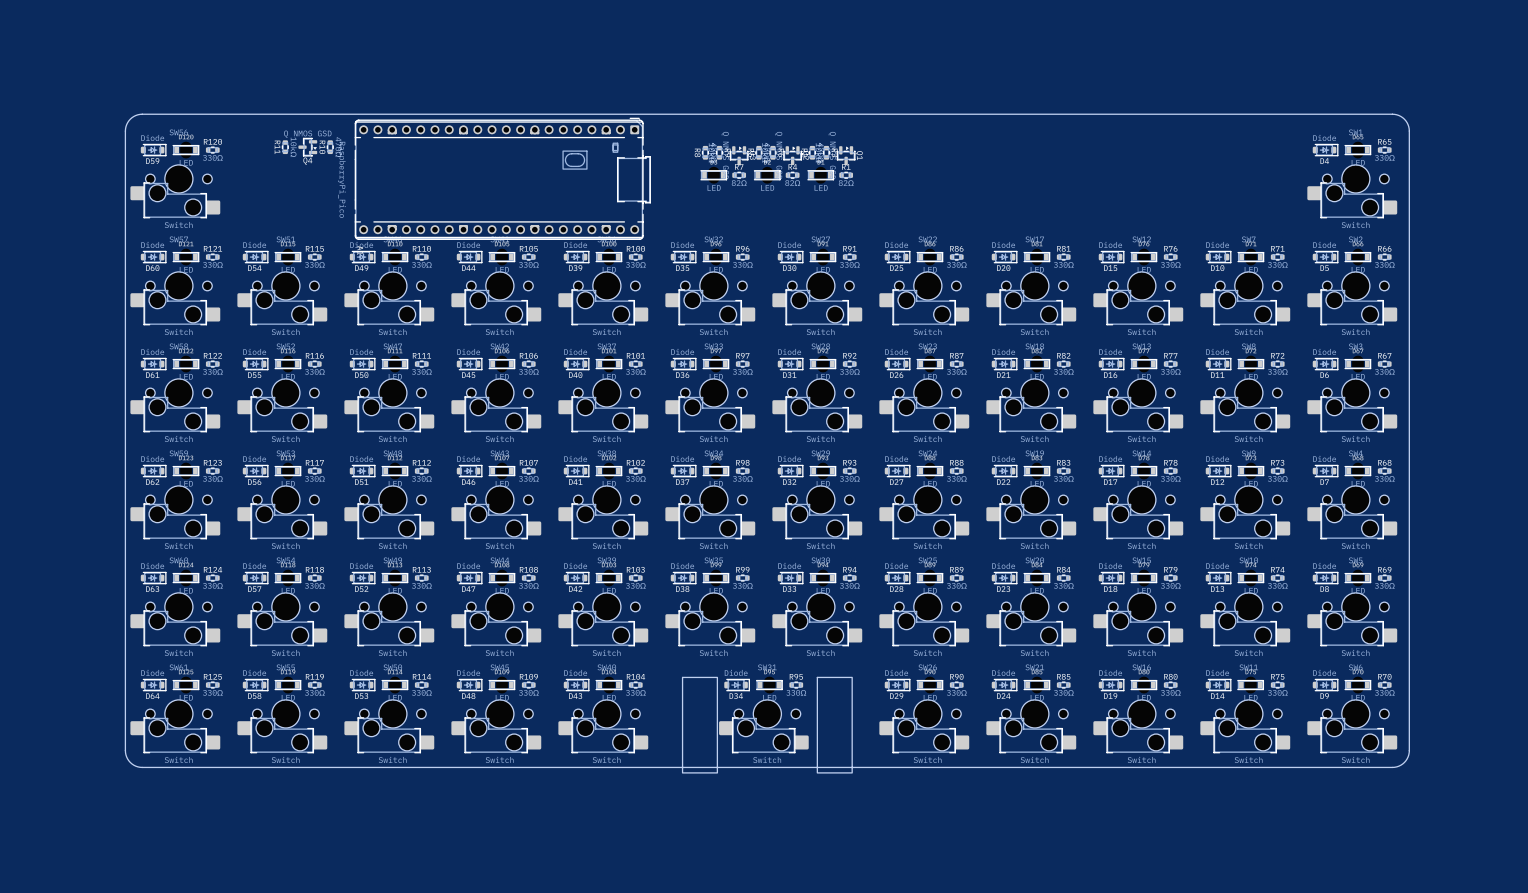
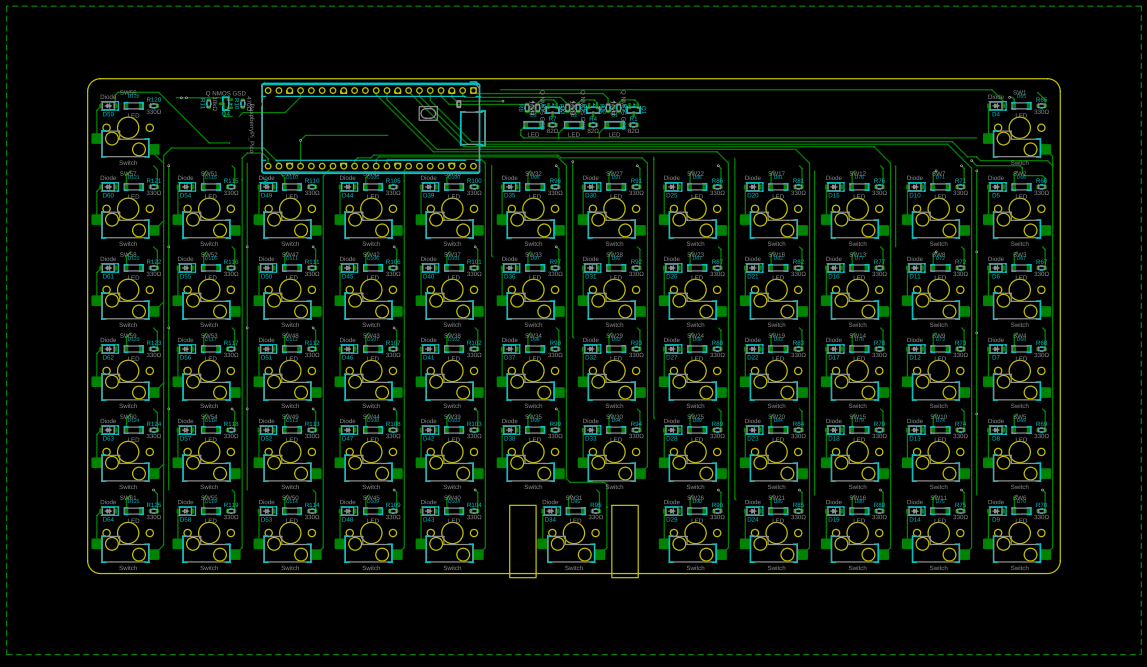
zone outline: none -> (1141, 6) (6, 6) (6, 654) (1141, 654) (1141, 6)
track: none -> (500, 89) (991, 89) (1003, 100) (1003, 105)
track: none -> (300, 90) (300, 97) (285, 112) (243, 112) (239, 116)
track: none -> (376, 90) (376, 94) (433, 151) (717, 151) (728, 163) (728, 547) (721, 554)
track: none -> (387, 90) (387, 99) (436, 149) (795, 149) (809, 163) (809, 547) (802, 554)
track: none -> (408, 90) (463, 146) (874, 146) (890, 163) (890, 547) (883, 554)
track: none -> (419, 90) (419, 96) (467, 144) (947, 144) (971, 168) (971, 547) (964, 554)
track: none -> (430, 90) (430, 100) (471, 141) (952, 141) (967, 156) (976, 156) (980, 160) (1047, 160) (1052, 165)
track: none -> (441, 90) (441, 96) (449, 104) (527, 104)
track: none -> (451, 90) (451, 96) (456, 101) (503, 101)
track: none -> (462, 90) (465, 97) (560, 97) (567, 104)
track: none -> (473, 90) (476, 93) (603, 93) (608, 98) (608, 104)
track: none -> (1037, 92) (1045, 99) (1045, 105)
track: none -> (228, 97) (176, 97)
track: none -> (1009, 97) (1014, 99) (1014, 105)
via: none -> (1009, 97)
via: none -> (181, 97)
via: none -> (186, 97)
part footprint: [172, 141, 199, 159] -> [124, 99, 144, 113]
part footprint: [1344, 141, 1371, 159] -> [1011, 99, 1032, 113]
via: none -> (503, 101)
track: none -> (224, 105) (224, 116)
track: none -> (101, 105) (96, 110) (96, 138)
track: none -> (115, 105) (115, 95) (118, 92) (158, 92) (209, 142) (229, 142)
track: none -> (556, 106) (553, 99) (541, 99) (527, 111)
track: none -> (597, 106) (594, 99) (581, 99) (567, 111)
track: none -> (637, 106) (634, 99) (622, 99) (608, 111)
track: none -> (989, 105) (988, 138)
track: none -> (232, 116) (224, 116)
track: none -> (526, 124) (520, 130) (520, 135) (523, 137) (976, 137)
track: none -> (566, 124) (558, 133) (558, 137)
track: none -> (607, 124) (599, 132) (599, 137)
track: none -> (387, 135) (305, 135) (300, 140) (300, 166)
via: none -> (300, 140)
track: none -> (154, 149) (154, 153) (163, 163)
track: none -> (1045, 149) (1052, 156) (1052, 547) (1045, 554)
track: none -> (653, 156) (655, 419)
track: none -> (734, 158) (736, 500)
track: none -> (971, 160) (976, 165) (1020, 165) (1024, 175) (1042, 175) (1045, 178) (1045, 186)
via: none -> (971, 160)
track: none -> (572, 161) (573, 337)
via: none -> (572, 161)
track: none -> (247, 163) (247, 489)
track: none -> (491, 165) (492, 256)
track: none -> (153, 165) (157, 169) (157, 186)
track: none -> (168, 165) (168, 489)
via: none -> (168, 165)
track: none -> (232, 165) (234, 168) (234, 186)
track: none -> (268, 166) (268, 158) (262, 153) (247, 153) (242, 158) (242, 547) (235, 554)
track: none -> (278, 166) (278, 163) (263, 148) (171, 148) (163, 155) (163, 545) (154, 554)
track: none -> (332, 166) (323, 175) (323, 547) (316, 554)
track: none -> (354, 166) (354, 160) (357, 157) (370, 157) (373, 155) (558, 155) (560, 157) (642, 157) (647, 163) (647, 466) (640, 473)
track: none -> (376, 166) (376, 159) (378, 156) (557, 156) (566, 165) (566, 478) (570, 482) (604, 482) (606, 484) (606, 547) (599, 554)
track: none -> (387, 166) (387, 159) (481, 159) (485, 163) (485, 547) (478, 554)
track: none -> (408, 166) (404, 170) (404, 547) (397, 554)
track: none -> (556, 165) (558, 168) (558, 186)
via: none -> (556, 165)
track: none -> (637, 165) (639, 168) (639, 186)
via: none -> (637, 165)
track: none -> (718, 165) (720, 168) (720, 186)
via: none -> (718, 165)
track: none -> (799, 165) (801, 168) (801, 186)
track: none -> (880, 165) (883, 168) (883, 186)
track: none -> (895, 165) (895, 246)
track: none -> (961, 165) (964, 168) (964, 186)
via: none -> (961, 165)
track: none -> (130, 170) (126, 175) (126, 186)
track: none -> (206, 170) (203, 173) (203, 186)
track: none -> (530, 170) (527, 173) (527, 186)
track: none -> (611, 170) (608, 173) (608, 186)
track: none -> (693, 170) (690, 173) (690, 186)
track: none -> (774, 170) (771, 173) (771, 186)
track: none -> (814, 170) (814, 495)
track: none -> (855, 170) (852, 173) (852, 186)
track: none -> (936, 170) (933, 173) (933, 186)
via: none -> (936, 170)
track: none -> (976, 170) (976, 495)
via: none -> (976, 170)
track: none -> (1017, 171) (1014, 174) (1014, 186)
track: none -> (281, 174) (284, 177) (284, 186)
track: none -> (368, 174) (365, 177) (365, 186)
track: none -> (449, 174) (446, 177) (446, 186)
part footprint: [172, 248, 199, 266] -> [124, 180, 144, 194]
part footprint: [274, 248, 301, 266] -> [201, 180, 221, 194]
part footprint: [381, 248, 408, 266] -> [282, 180, 302, 194]
part footprint: [488, 248, 515, 266] -> [363, 180, 383, 194]
part footprint: [595, 248, 622, 266] -> [444, 180, 464, 194]
part footprint: [702, 248, 729, 266] -> [525, 180, 545, 194]
part footprint: [809, 248, 836, 266] -> [606, 180, 626, 194]
part footprint: [916, 248, 943, 266] -> [687, 180, 707, 194]
part footprint: [1023, 248, 1050, 266] -> [768, 180, 789, 194]
part footprint: [1130, 248, 1157, 266] -> [849, 180, 870, 194]
part footprint: [1237, 248, 1264, 266] -> [930, 180, 951, 194]
part footprint: [1344, 248, 1371, 266] -> [1011, 180, 1032, 194]
track: none -> (101, 186) (96, 191) (96, 219)
track: none -> (178, 186) (177, 219)
track: none -> (259, 186) (258, 219)
track: none -> (340, 186) (340, 219)
track: none -> (421, 186) (421, 219)
track: none -> (502, 186) (502, 219)
track: none -> (583, 186) (583, 219)
track: none -> (664, 186) (664, 219)
track: none -> (745, 186) (745, 219)
track: none -> (826, 186) (826, 219)
track: none -> (907, 186) (907, 219)
track: none -> (989, 186) (988, 219)
track: none -> (163, 220) (154, 230)
track: none -> (153, 246) (157, 250) (157, 267)
via: none -> (168, 246)
track: none -> (232, 246) (234, 249) (234, 267)
via: none -> (247, 246)
track: none -> (313, 246) (315, 249) (315, 267)
via: none -> (313, 246)
track: none -> (394, 246) (396, 249) (396, 267)
via: none -> (394, 246)
track: none -> (475, 246) (477, 249) (477, 267)
via: none -> (475, 246)
track: none -> (556, 246) (558, 249) (558, 267)
via: none -> (556, 246)
track: none -> (637, 246) (639, 249) (639, 267)
track: none -> (718, 246) (720, 249) (720, 267)
track: none -> (799, 246) (801, 249) (801, 267)
track: none -> (880, 246) (883, 249) (883, 267)
track: none -> (961, 246) (964, 249) (964, 267)
track: none -> (1042, 246) (1045, 249) (1045, 267)
track: none -> (130, 251) (126, 256) (126, 267)
track: none -> (206, 251) (203, 254) (203, 267)
track: none -> (287, 251) (284, 254) (284, 267)
track: none -> (368, 251) (365, 254) (365, 267)
track: none -> (449, 251) (446, 254) (446, 267)
track: none -> (530, 251) (527, 254) (527, 267)
track: none -> (611, 251) (608, 254) (608, 267)
track: none -> (693, 251) (690, 254) (690, 267)
track: none -> (774, 251) (771, 254) (771, 267)
track: none -> (855, 251) (852, 254) (852, 267)
track: none -> (936, 251) (933, 254) (933, 267)
via: none -> (936, 251)
via: none -> (976, 251)
track: none -> (1017, 251) (1014, 254) (1014, 267)
part footprint: [172, 355, 199, 373] -> [124, 261, 144, 275]
part footprint: [274, 355, 301, 373] -> [201, 261, 221, 275]
part footprint: [381, 355, 408, 373] -> [282, 261, 302, 275]
part footprint: [488, 355, 515, 373] -> [363, 261, 383, 275]
part footprint: [595, 355, 622, 373] -> [444, 261, 464, 275]
part footprint: [702, 355, 729, 373] -> [525, 261, 545, 275]
part footprint: [809, 355, 836, 373] -> [606, 261, 626, 275]
part footprint: [916, 355, 943, 373] -> [687, 261, 707, 275]
part footprint: [1023, 355, 1050, 373] -> [768, 261, 789, 275]
part footprint: [1130, 355, 1157, 373] -> [849, 261, 870, 275]
part footprint: [1237, 355, 1264, 373] -> [930, 261, 951, 275]
part footprint: [1344, 355, 1371, 373] -> [1011, 261, 1032, 275]
track: none -> (101, 267) (96, 272) (96, 300)
track: none -> (178, 267) (177, 300)
track: none -> (259, 267) (258, 300)
track: none -> (340, 267) (340, 300)
track: none -> (421, 267) (421, 300)
track: none -> (502, 267) (502, 300)
track: none -> (583, 267) (583, 300)
track: none -> (664, 267) (664, 300)
track: none -> (745, 267) (745, 300)
track: none -> (826, 267) (826, 300)
track: none -> (907, 267) (907, 300)
track: none -> (989, 267) (988, 300)
track: none -> (163, 301) (154, 311)
track: none -> (153, 327) (157, 331) (157, 349)
via: none -> (168, 327)
track: none -> (232, 327) (234, 330) (234, 349)
via: none -> (247, 327)
track: none -> (313, 327) (315, 330) (315, 349)
via: none -> (313, 327)
track: none -> (394, 327) (396, 330) (396, 349)
via: none -> (394, 327)
track: none -> (475, 327) (477, 330) (477, 349)
track: none -> (556, 327) (558, 330) (558, 349)
track: none -> (637, 327) (639, 330) (639, 349)
track: none -> (718, 327) (720, 330) (720, 349)
track: none -> (799, 327) (801, 330) (801, 349)
track: none -> (880, 327) (883, 330) (883, 349)
track: none -> (961, 327) (964, 330) (964, 349)
track: none -> (1042, 327) (1045, 330) (1045, 349)
track: none -> (130, 332) (126, 337) (126, 349)
track: none -> (206, 332) (203, 335) (203, 349)
track: none -> (287, 332) (284, 335) (284, 349)
track: none -> (368, 332) (365, 335) (365, 349)
track: none -> (449, 332) (446, 335) (446, 349)
track: none -> (530, 332) (527, 335) (527, 349)
track: none -> (611, 332) (608, 335) (608, 349)
track: none -> (693, 332) (690, 335) (690, 349)
track: none -> (774, 332) (771, 335) (771, 349)
track: none -> (855, 332) (852, 335) (852, 349)
track: none -> (936, 332) (933, 335) (933, 349)
via: none -> (976, 332)
track: none -> (1017, 332) (1014, 335) (1014, 349)
part footprint: [172, 462, 199, 480] -> [124, 342, 144, 356]
part footprint: [274, 462, 301, 480] -> [201, 342, 221, 356]
part footprint: [381, 462, 408, 480] -> [282, 342, 302, 356]
part footprint: [488, 462, 515, 480] -> [363, 342, 383, 356]
part footprint: [595, 462, 622, 480] -> [444, 342, 464, 356]
part footprint: [702, 462, 729, 480] -> [525, 342, 545, 356]
part footprint: [809, 462, 836, 480] -> [606, 342, 626, 356]
part footprint: [916, 462, 943, 480] -> [687, 342, 707, 356]
part footprint: [1023, 462, 1050, 480] -> [768, 342, 789, 356]
part footprint: [1130, 462, 1157, 480] -> [849, 342, 870, 356]
part footprint: [1237, 462, 1264, 480] -> [930, 342, 951, 356]
part footprint: [1344, 462, 1371, 480] -> [1011, 342, 1032, 356]
track: none -> (101, 349) (96, 353) (96, 381)
track: none -> (178, 349) (177, 381)
track: none -> (259, 349) (258, 381)
track: none -> (340, 349) (340, 381)
track: none -> (421, 349) (421, 381)
track: none -> (502, 349) (502, 381)
track: none -> (583, 349) (583, 381)
track: none -> (664, 349) (664, 381)
track: none -> (745, 349) (745, 381)
track: none -> (826, 349) (826, 381)
track: none -> (907, 349) (907, 381)
track: none -> (989, 349) (988, 381)
track: none -> (163, 382) (154, 392)
track: none -> (153, 408) (157, 412) (157, 430)
via: none -> (168, 408)
track: none -> (232, 408) (234, 411) (234, 430)
via: none -> (232, 408)
via: none -> (247, 408)
track: none -> (313, 408) (315, 411) (315, 430)
via: none -> (313, 408)
track: none -> (394, 408) (396, 411) (396, 430)
via: none -> (394, 408)
track: none -> (475, 408) (477, 411) (477, 430)
via: none -> (475, 408)
track: none -> (556, 408) (558, 411) (558, 430)
via: none -> (556, 408)
track: none -> (637, 408) (639, 411) (639, 430)
track: none -> (718, 408) (720, 411) (720, 430)
track: none -> (799, 408) (801, 411) (801, 430)
track: none -> (880, 408) (883, 411) (883, 430)
track: none -> (961, 408) (964, 411) (964, 430)
track: none -> (1042, 408) (1045, 411) (1045, 430)
track: none -> (130, 413) (126, 418) (126, 430)
track: none -> (206, 413) (203, 416) (203, 430)
track: none -> (287, 413) (284, 416) (284, 430)
track: none -> (368, 413) (365, 416) (365, 430)
track: none -> (449, 413) (446, 416) (446, 430)
track: none -> (530, 413) (527, 416) (527, 430)
track: none -> (611, 413) (608, 416) (608, 430)
track: none -> (693, 413) (690, 416) (690, 430)
track: none -> (774, 413) (771, 416) (771, 430)
track: none -> (855, 413) (852, 416) (852, 430)
track: none -> (936, 413) (933, 416) (933, 430)
via: none -> (976, 413)
track: none -> (1017, 413) (1014, 416) (1014, 430)
part footprint: [172, 569, 199, 587] -> [124, 423, 144, 437]
part footprint: [274, 569, 301, 587] -> [201, 423, 221, 437]
part footprint: [381, 569, 408, 587] -> [282, 423, 302, 437]
part footprint: [488, 569, 515, 587] -> [363, 423, 383, 437]
part footprint: [595, 569, 622, 587] -> [444, 423, 464, 437]
part footprint: [702, 569, 729, 587] -> [525, 423, 545, 437]
part footprint: [809, 569, 836, 587] -> [606, 423, 626, 437]
part footprint: [916, 569, 943, 587] -> [687, 423, 707, 437]
part footprint: [1023, 569, 1050, 587] -> [768, 423, 789, 437]
part footprint: [1130, 569, 1157, 587] -> [849, 423, 870, 437]
part footprint: [1237, 569, 1264, 587] -> [930, 423, 951, 437]
part footprint: [1344, 569, 1371, 587] -> [1011, 423, 1032, 437]
track: none -> (101, 430) (96, 434) (96, 462)
track: none -> (178, 430) (177, 462)
track: none -> (259, 430) (258, 462)
track: none -> (340, 430) (340, 462)
track: none -> (421, 430) (421, 462)
track: none -> (502, 430) (502, 462)
track: none -> (583, 430) (583, 462)
track: none -> (664, 430) (664, 462)
track: none -> (745, 430) (745, 462)
track: none -> (826, 430) (826, 462)
track: none -> (907, 430) (907, 462)
track: none -> (989, 430) (988, 462)
track: none -> (163, 464) (154, 473)
track: none -> (153, 489) (157, 493) (157, 511)
via: none -> (153, 489)
track: none -> (232, 489) (234, 492) (234, 511)
track: none -> (313, 489) (315, 492) (315, 511)
track: none -> (394, 489) (396, 492) (396, 511)
via: none -> (394, 489)
track: none -> (475, 489) (477, 492) (477, 511)
via: none -> (475, 489)
track: none -> (596, 489) (599, 492) (599, 511)
track: none -> (718, 489) (720, 492) (720, 511)
via: none -> (718, 489)
track: none -> (799, 489) (801, 492) (801, 511)
via: none -> (799, 489)
track: none -> (880, 489) (883, 492) (883, 511)
via: none -> (880, 489)
track: none -> (961, 489) (964, 492) (964, 511)
via: none -> (961, 489)
track: none -> (1042, 489) (1045, 492) (1045, 511)
via: none -> (1042, 489)
track: none -> (130, 495) (126, 499) (126, 511)
track: none -> (206, 495) (203, 497) (203, 511)
track: none -> (287, 495) (284, 497) (284, 511)
track: none -> (368, 495) (365, 497) (365, 511)
track: none -> (449, 495) (446, 497) (446, 511)
track: none -> (571, 495) (568, 497) (568, 511)
track: none -> (693, 495) (690, 497) (690, 511)
track: none -> (774, 495) (771, 497) (771, 511)
track: none -> (855, 495) (852, 497) (852, 511)
track: none -> (936, 495) (933, 498) (933, 511)
track: none -> (1017, 495) (1014, 497) (1014, 511)
part footprint: [172, 676, 199, 694] -> [124, 504, 144, 518]
part footprint: [274, 676, 301, 694] -> [201, 504, 221, 518]
part footprint: [381, 676, 408, 694] -> [282, 504, 302, 518]
part footprint: [488, 676, 515, 694] -> [363, 504, 383, 518]
part footprint: [595, 676, 622, 694] -> [444, 504, 464, 518]
part footprint: [756, 676, 783, 694] -> [566, 504, 586, 518]
part footprint: [916, 676, 943, 694] -> [687, 504, 707, 518]
part footprint: [1023, 676, 1050, 694] -> [768, 504, 789, 518]
part footprint: [1130, 676, 1157, 694] -> [849, 504, 870, 518]
part footprint: [1237, 676, 1264, 694] -> [930, 504, 950, 518]
part footprint: [1344, 676, 1371, 694] -> [1011, 504, 1032, 518]
track: none -> (101, 511) (96, 515) (96, 543)
track: none -> (178, 511) (177, 543)
track: none -> (259, 511) (258, 543)
track: none -> (340, 511) (340, 543)
track: none -> (421, 511) (421, 543)
track: none -> (543, 511) (542, 543)
track: none -> (664, 511) (664, 543)
track: none -> (745, 511) (745, 543)
track: none -> (826, 511) (826, 543)
track: none -> (907, 511) (907, 543)
track: none -> (989, 511) (988, 543)

